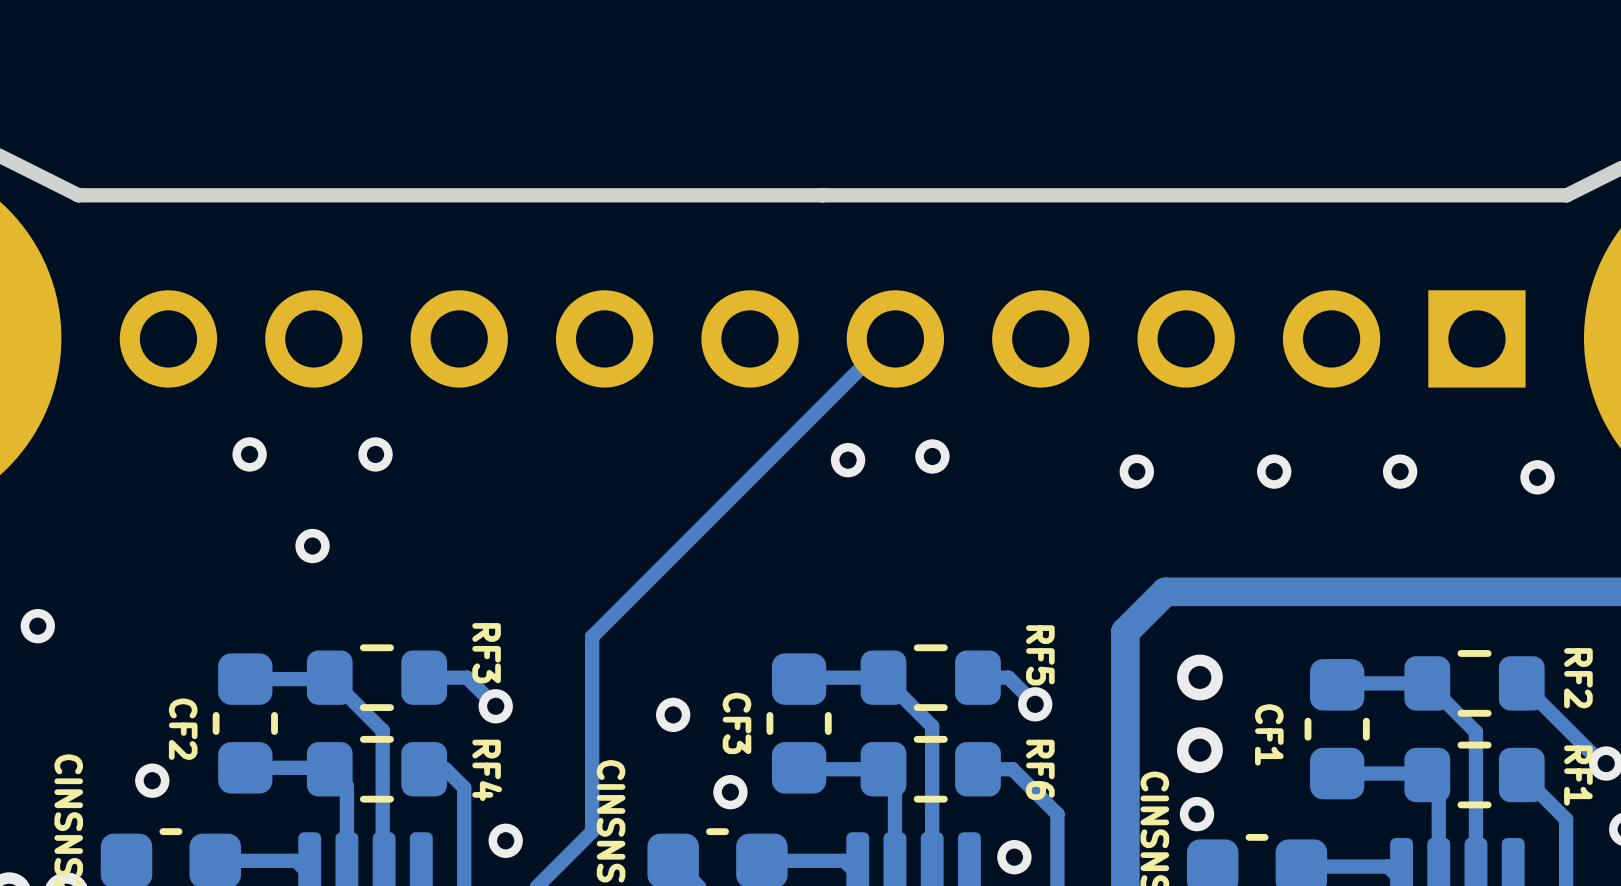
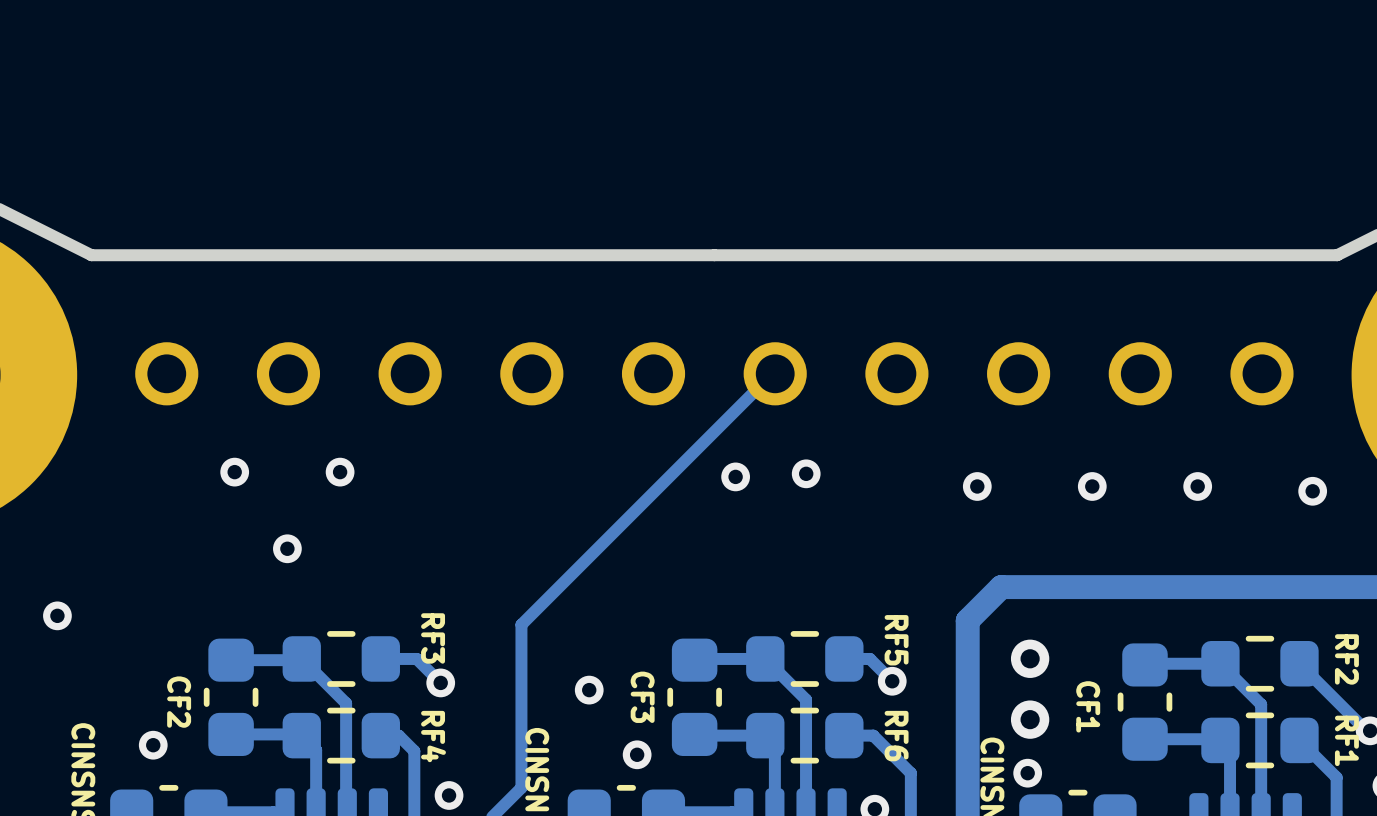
part footprint: [119, 290, 1526, 388] -> [135, 342, 1294, 406]

